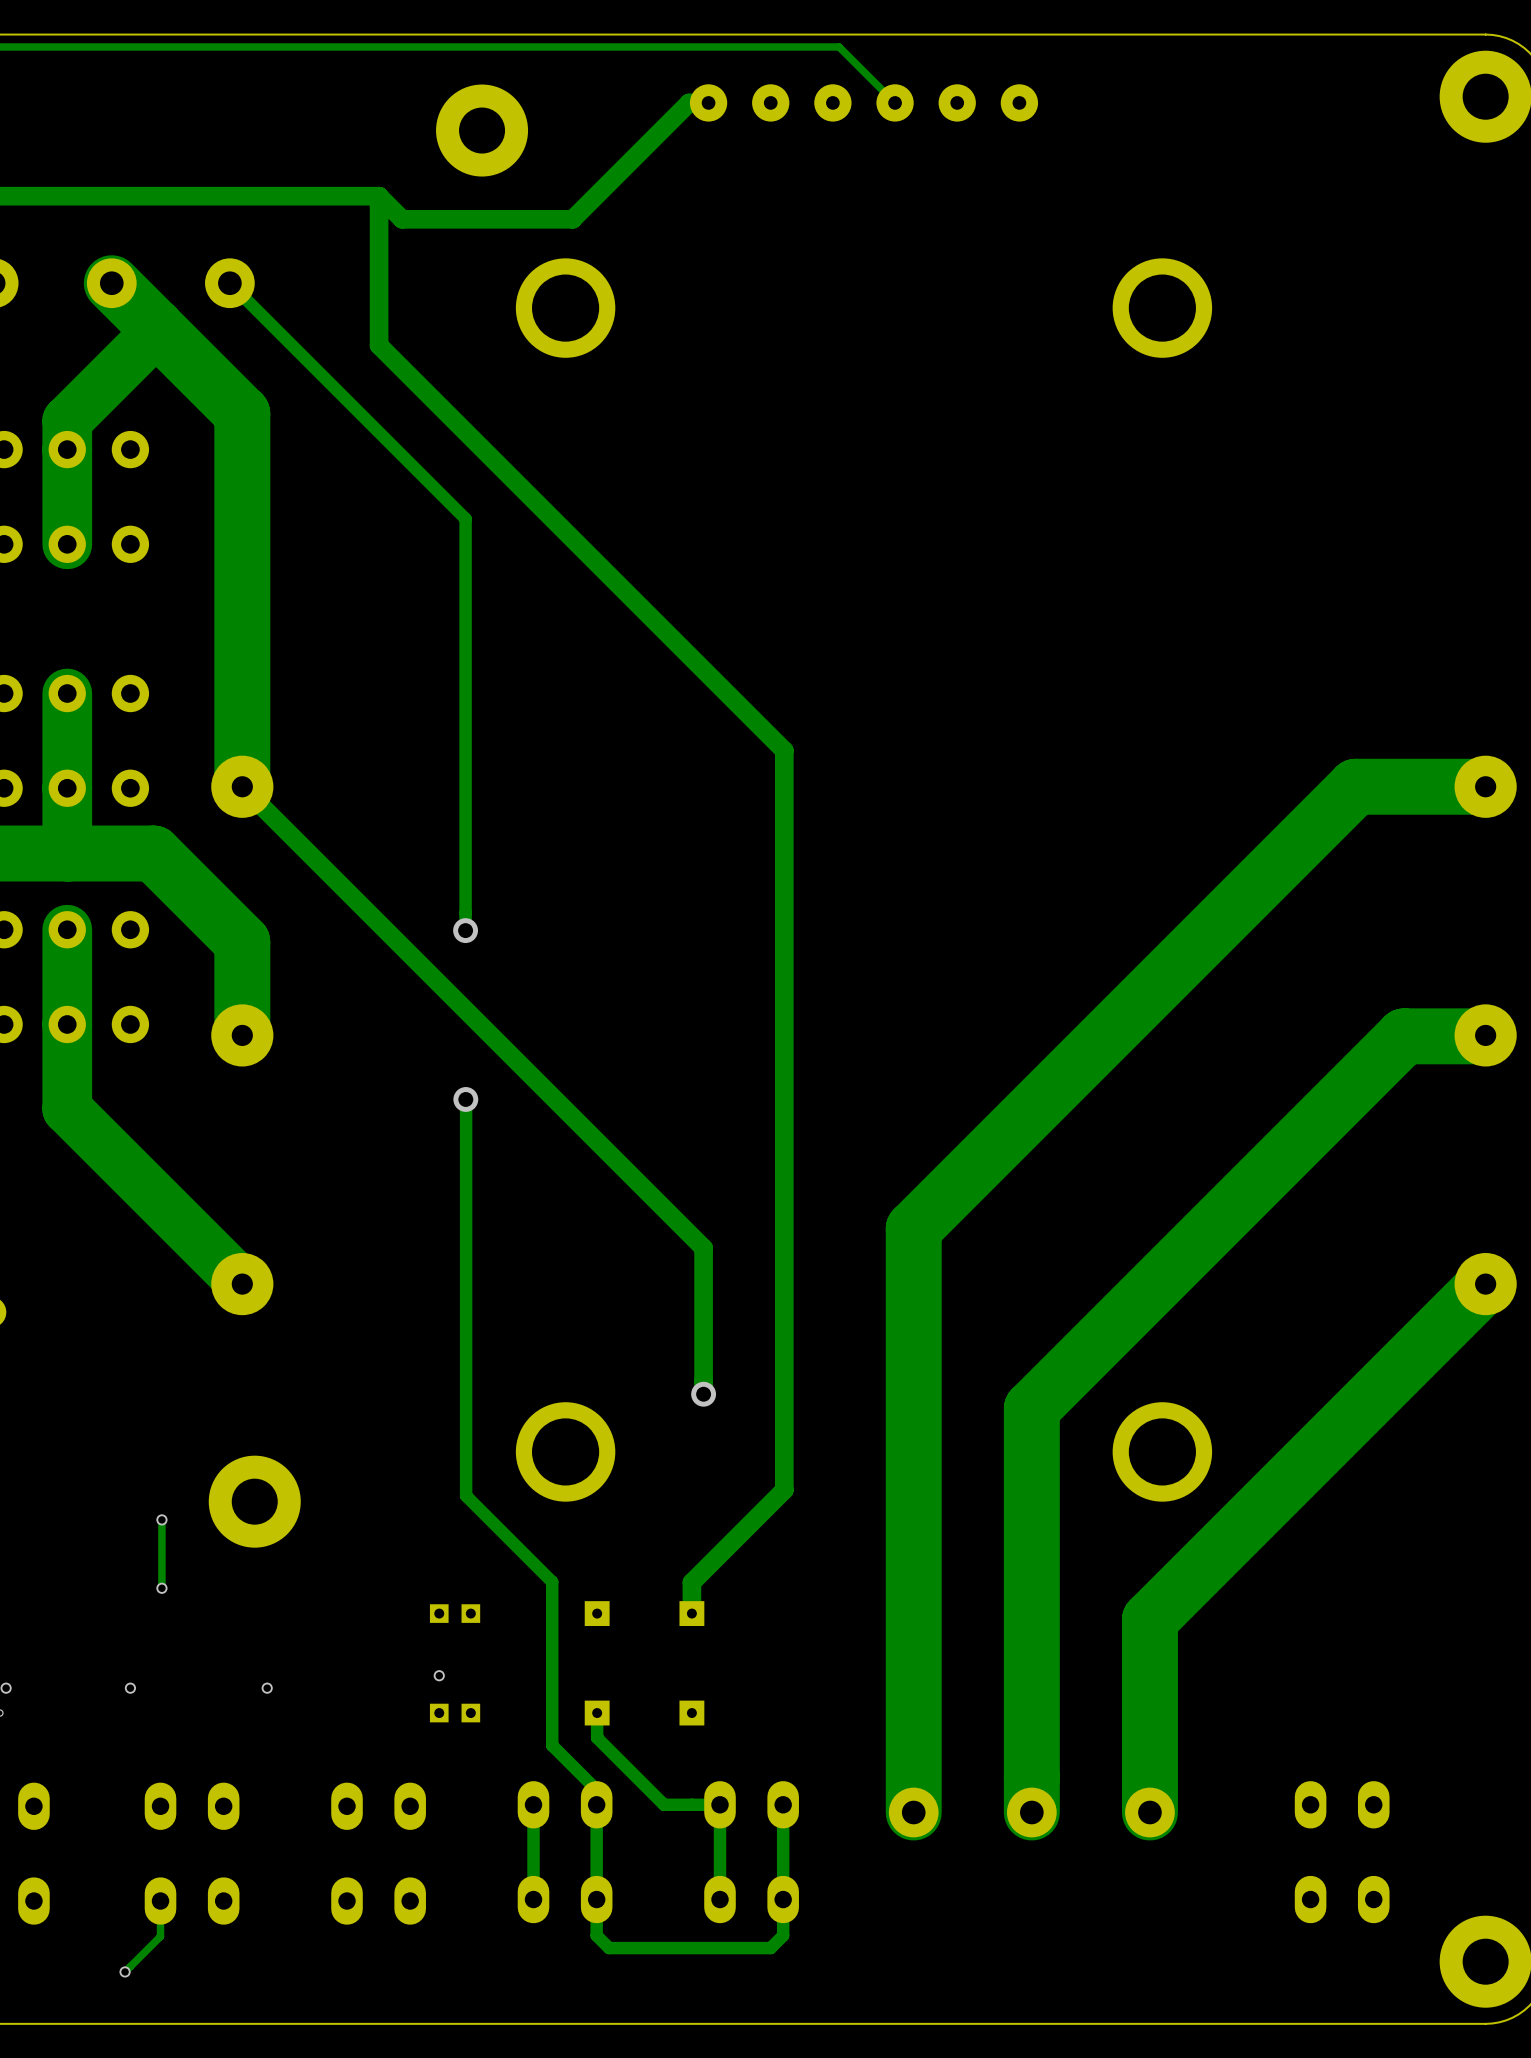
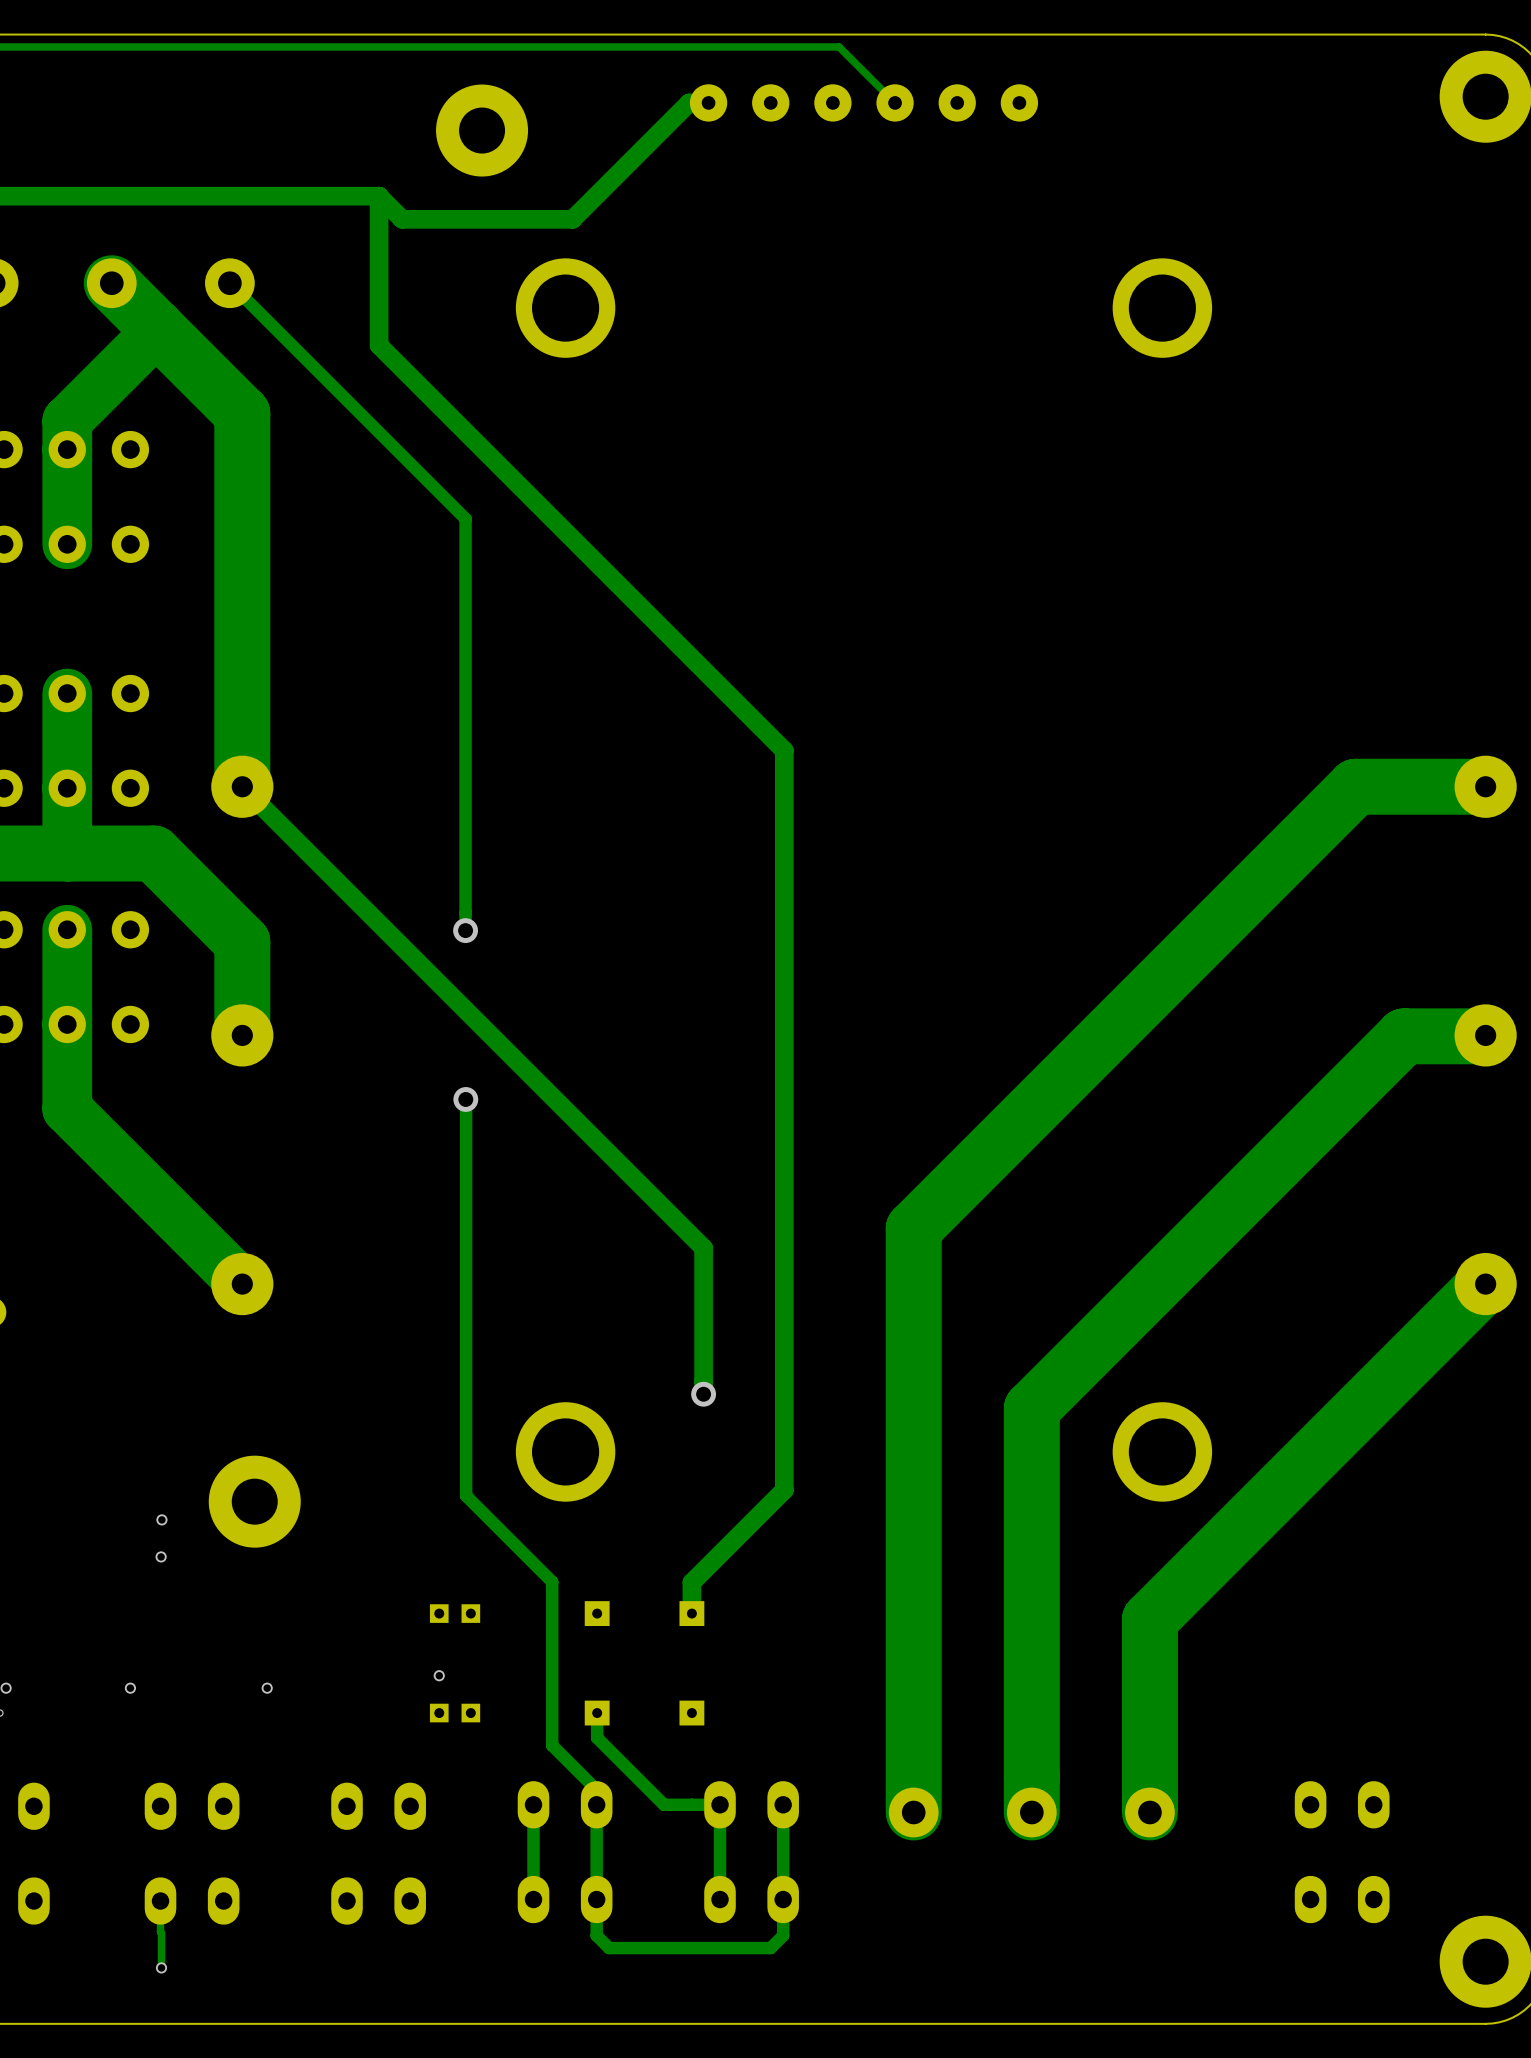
track: (161, 1519) (161, 1588) -> none
via position: (161, 1588) -> (161, 1556)
track: (160, 1932) (160, 1936) (125, 1971) -> (160, 1932) (161, 1967)
via position: (125, 1971) -> (161, 1967)

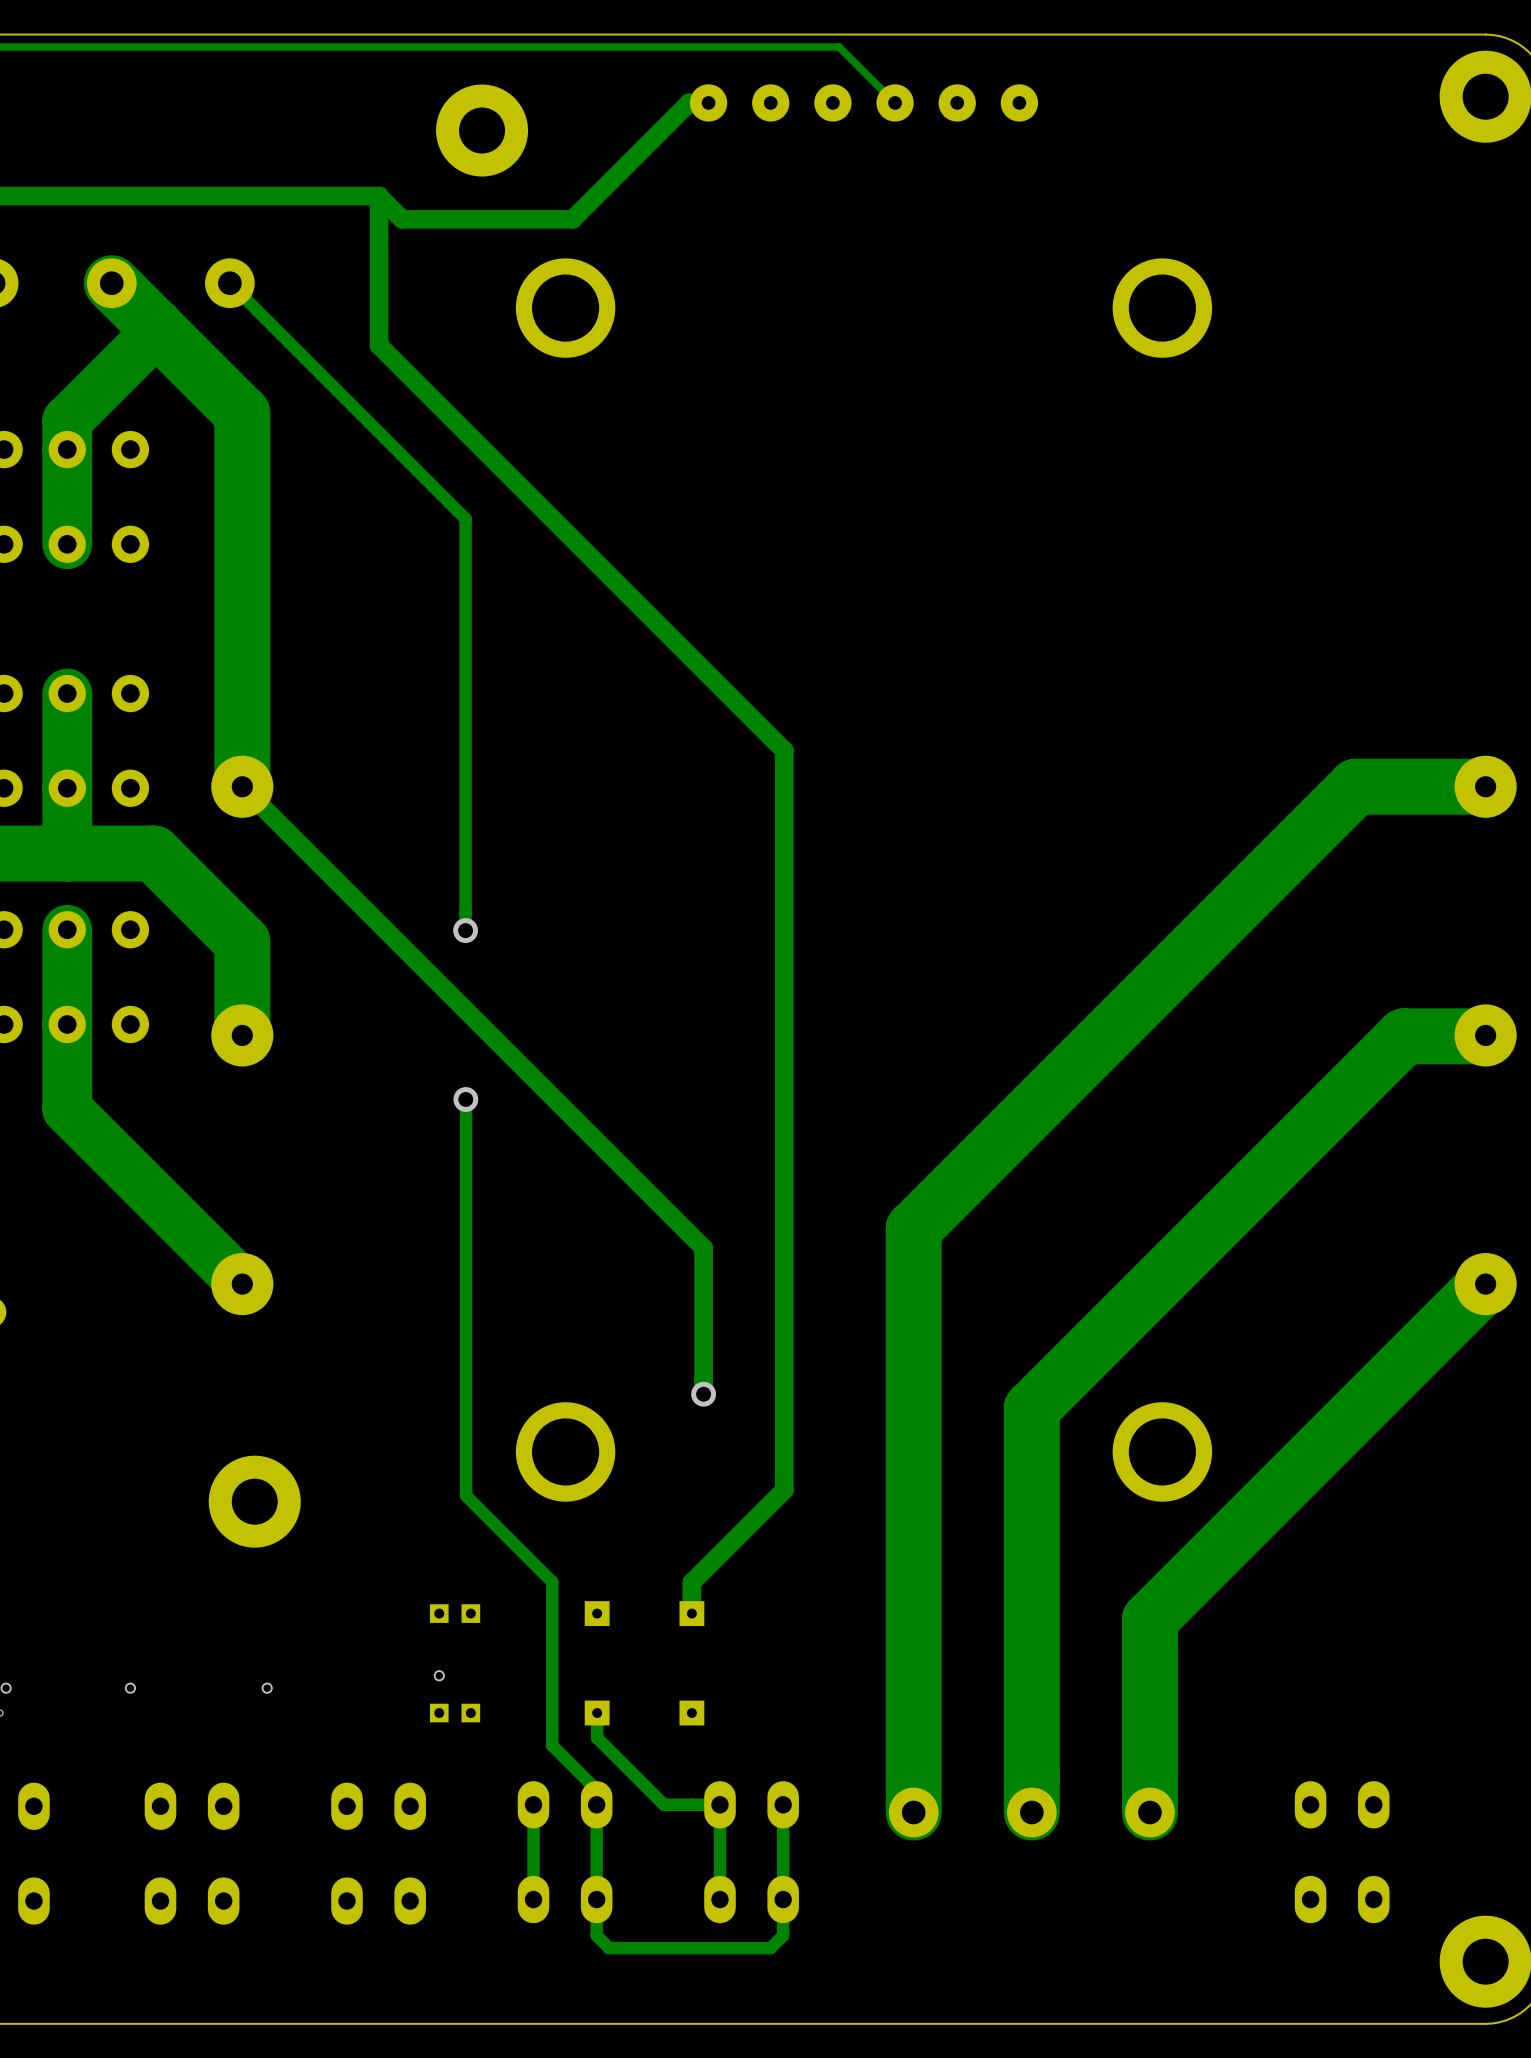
via: (161, 1519) -> none
via: (161, 1556) -> none
track: (160, 1901) (161, 1967) -> none
via: (161, 1967) -> none

